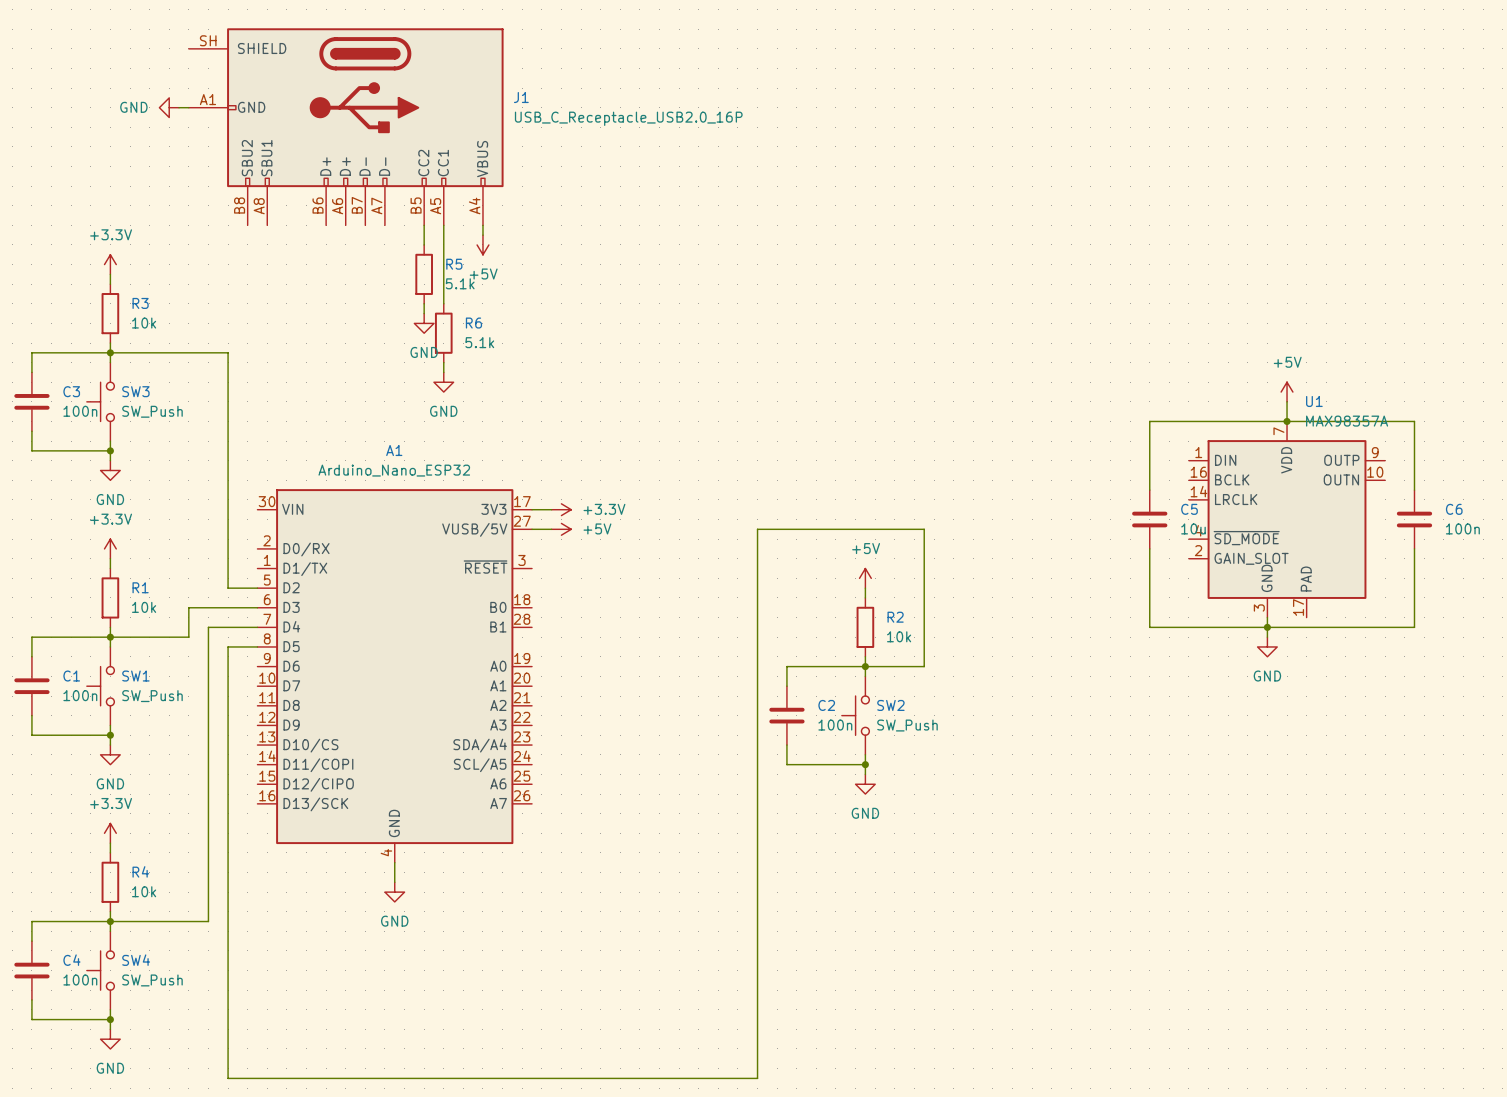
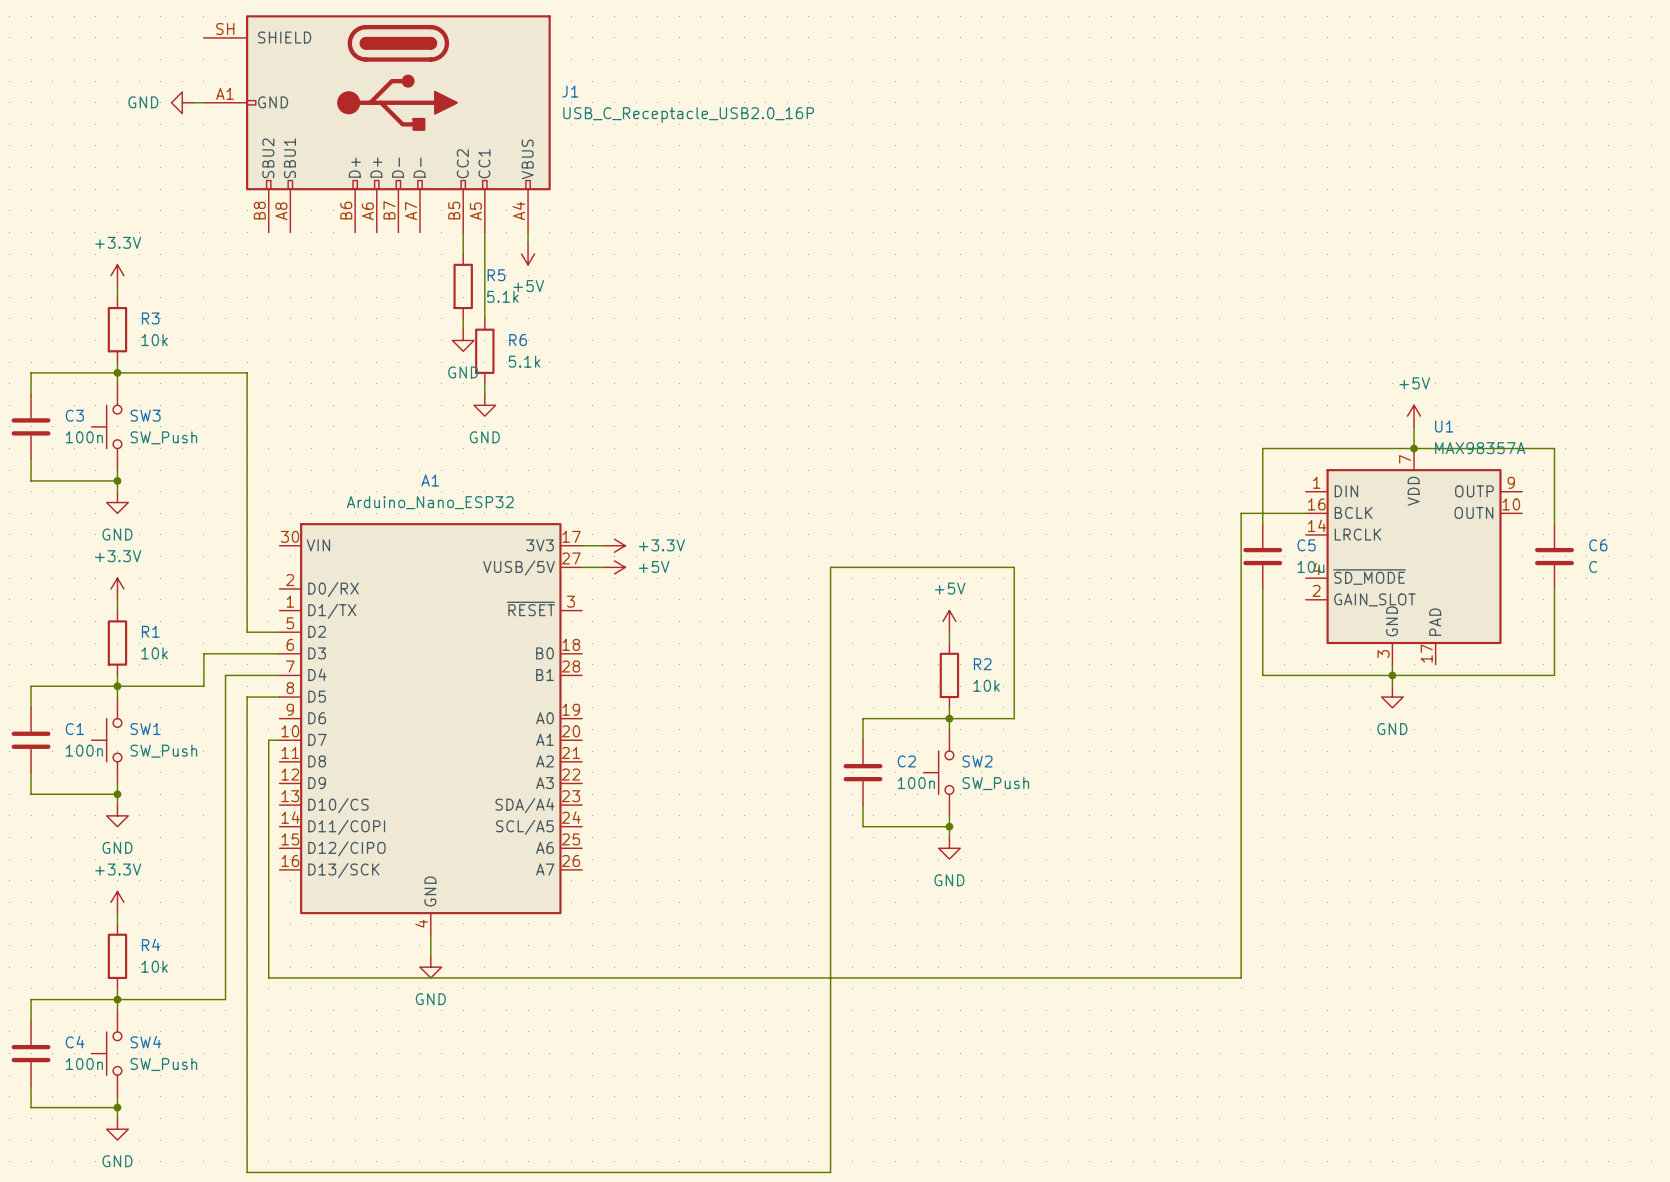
wire: none -> (1305, 513) (1241, 513) (1241, 977) (268, 977) (268, 740) (279, 740)
C6 value: 100n (1462, 528) -> C (1593, 566)

